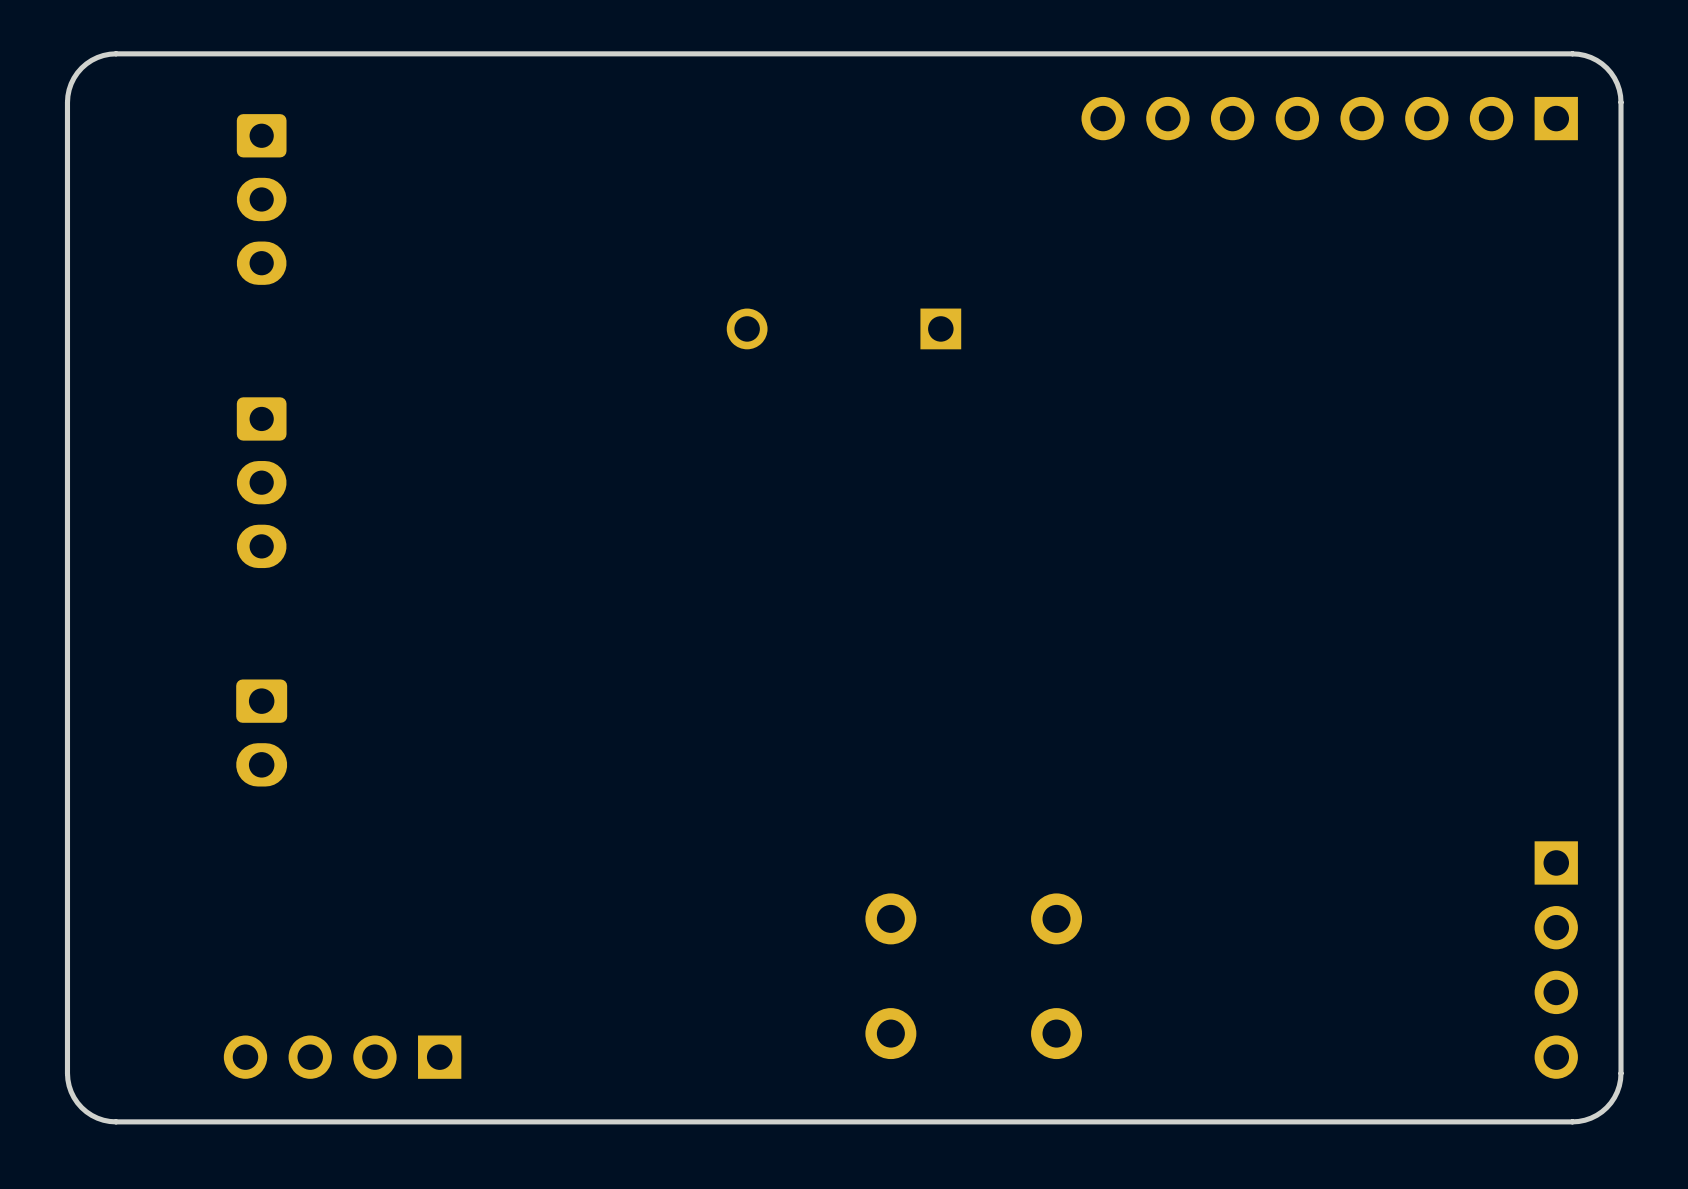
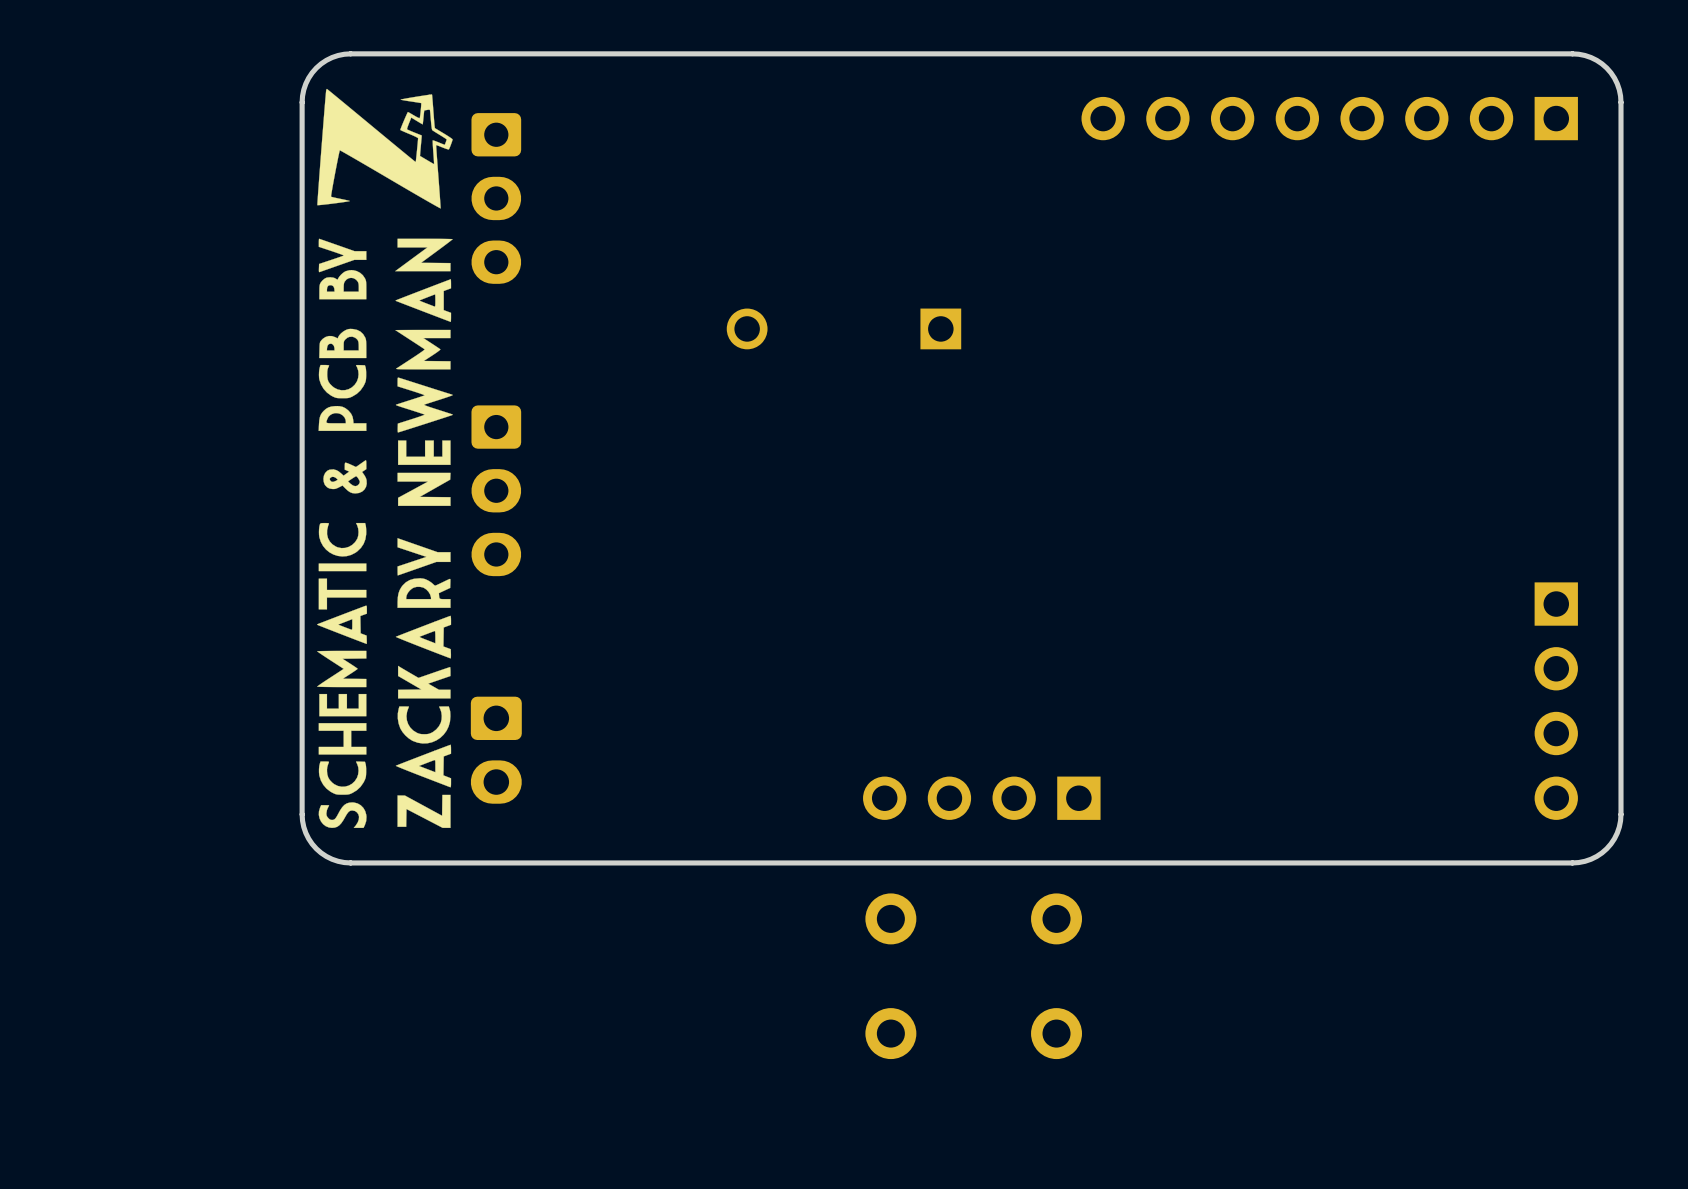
board edge: (350, 53) (109, 54) (97, 57) (81, 68) (73, 78) (69, 89) (67, 102) (67, 1073) (69, 1085) (73, 1097) (81, 1107) (91, 1115) (103, 1120) (116, 1121) (1578, 1121) (1596, 1115) (1606, 1107) (1617, 1091) (1620, 1079) (1621, 814) -> (350, 53) (332, 57) (316, 68) (305, 83) (302, 102) (302, 814) (303, 826) (308, 838) (316, 848) (326, 856) (338, 861) (350, 862) (1572, 862) (1591, 859) (1606, 848) (1617, 832) (1621, 814)
drawing: none -> [317, 88, 453, 828]
part: none -> (496, 198)
part: (261, 199) -> none
part: (261, 482) -> none
part: none -> (496, 490)
part position: (261, 732) -> (496, 750)
part: none -> (981, 798)
part position: (1556, 960) -> (1556, 701)
part: (342, 1057) -> none

